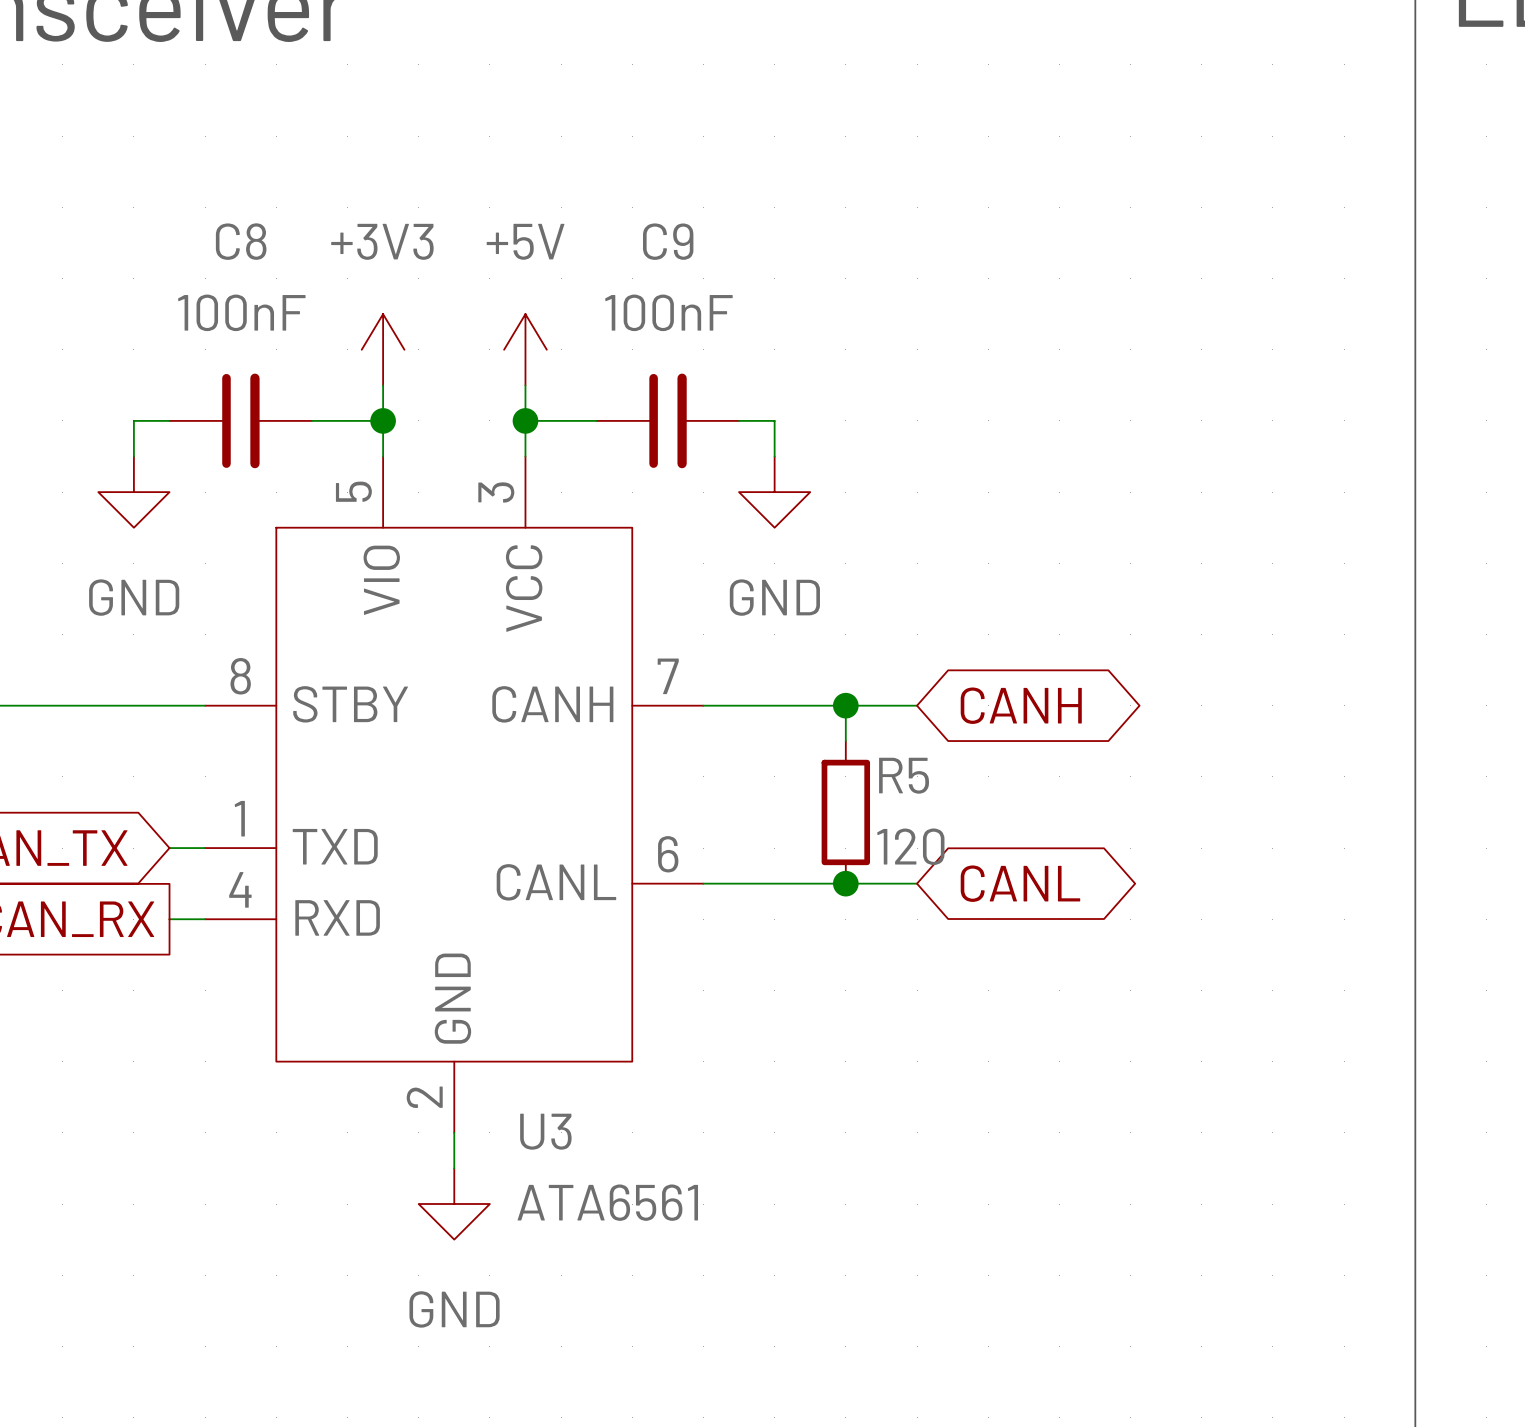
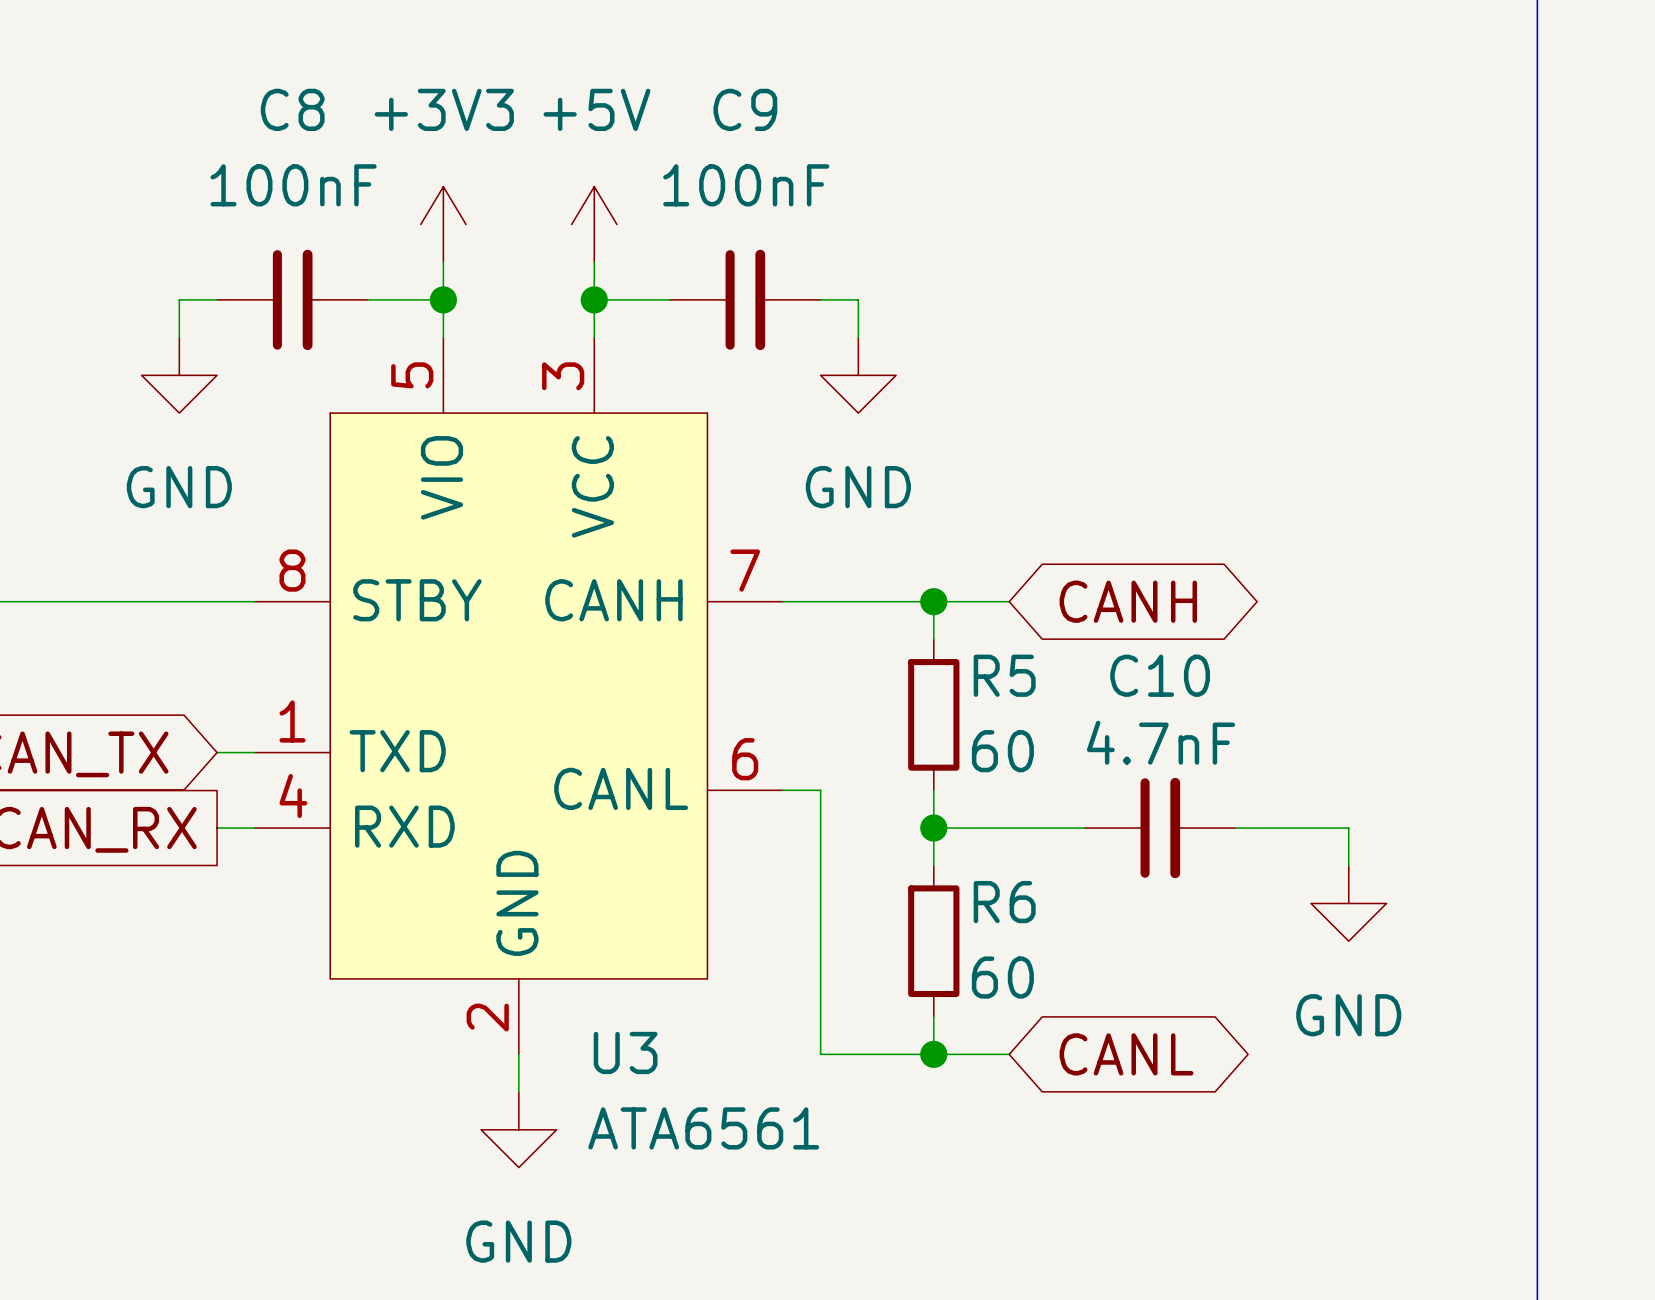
R5 value: 120 (910, 846) -> 60 (1002, 751)
wire: (739, 883) (917, 883) -> (820, 790) (820, 1054) (1009, 1054)
wire: none -> (933, 790) (933, 865)
junction position: (845, 883) -> (933, 828)
global label position: CANL (1020, 883) -> CANL (1126, 1054)
wire: none -> (933, 828) (1084, 828)
C10: none -> 4.7nF (1160, 828)
wire: none -> (1235, 828) (1348, 828) (1348, 865)
power symbol: none -> GND (1348, 903)
R6: none -> 60 (933, 941)
wire: none -> (933, 1016) (933, 1054)
junction: none -> (933, 1054)

